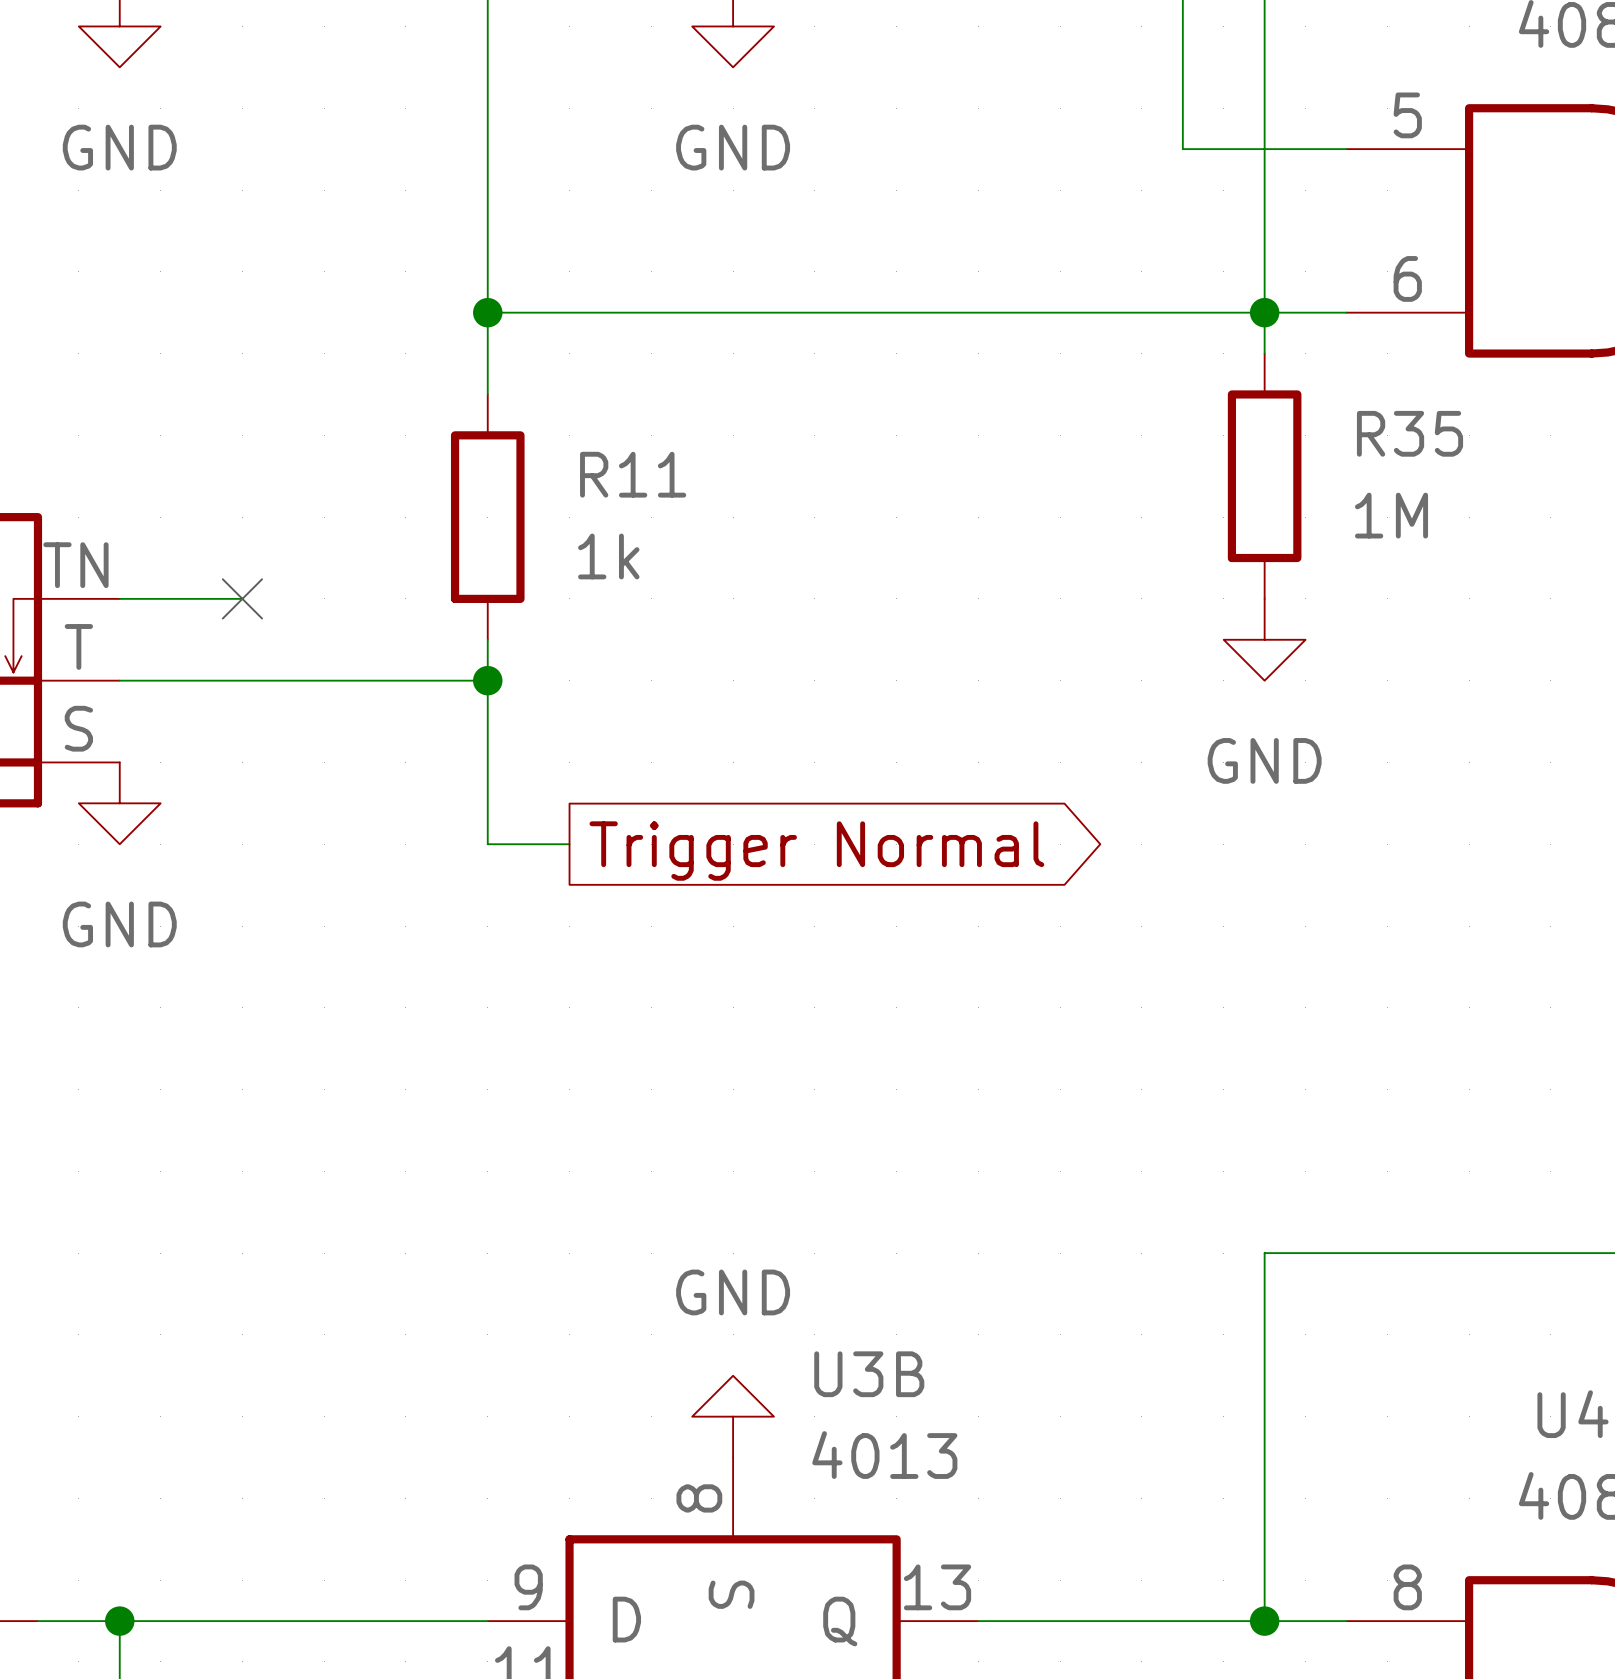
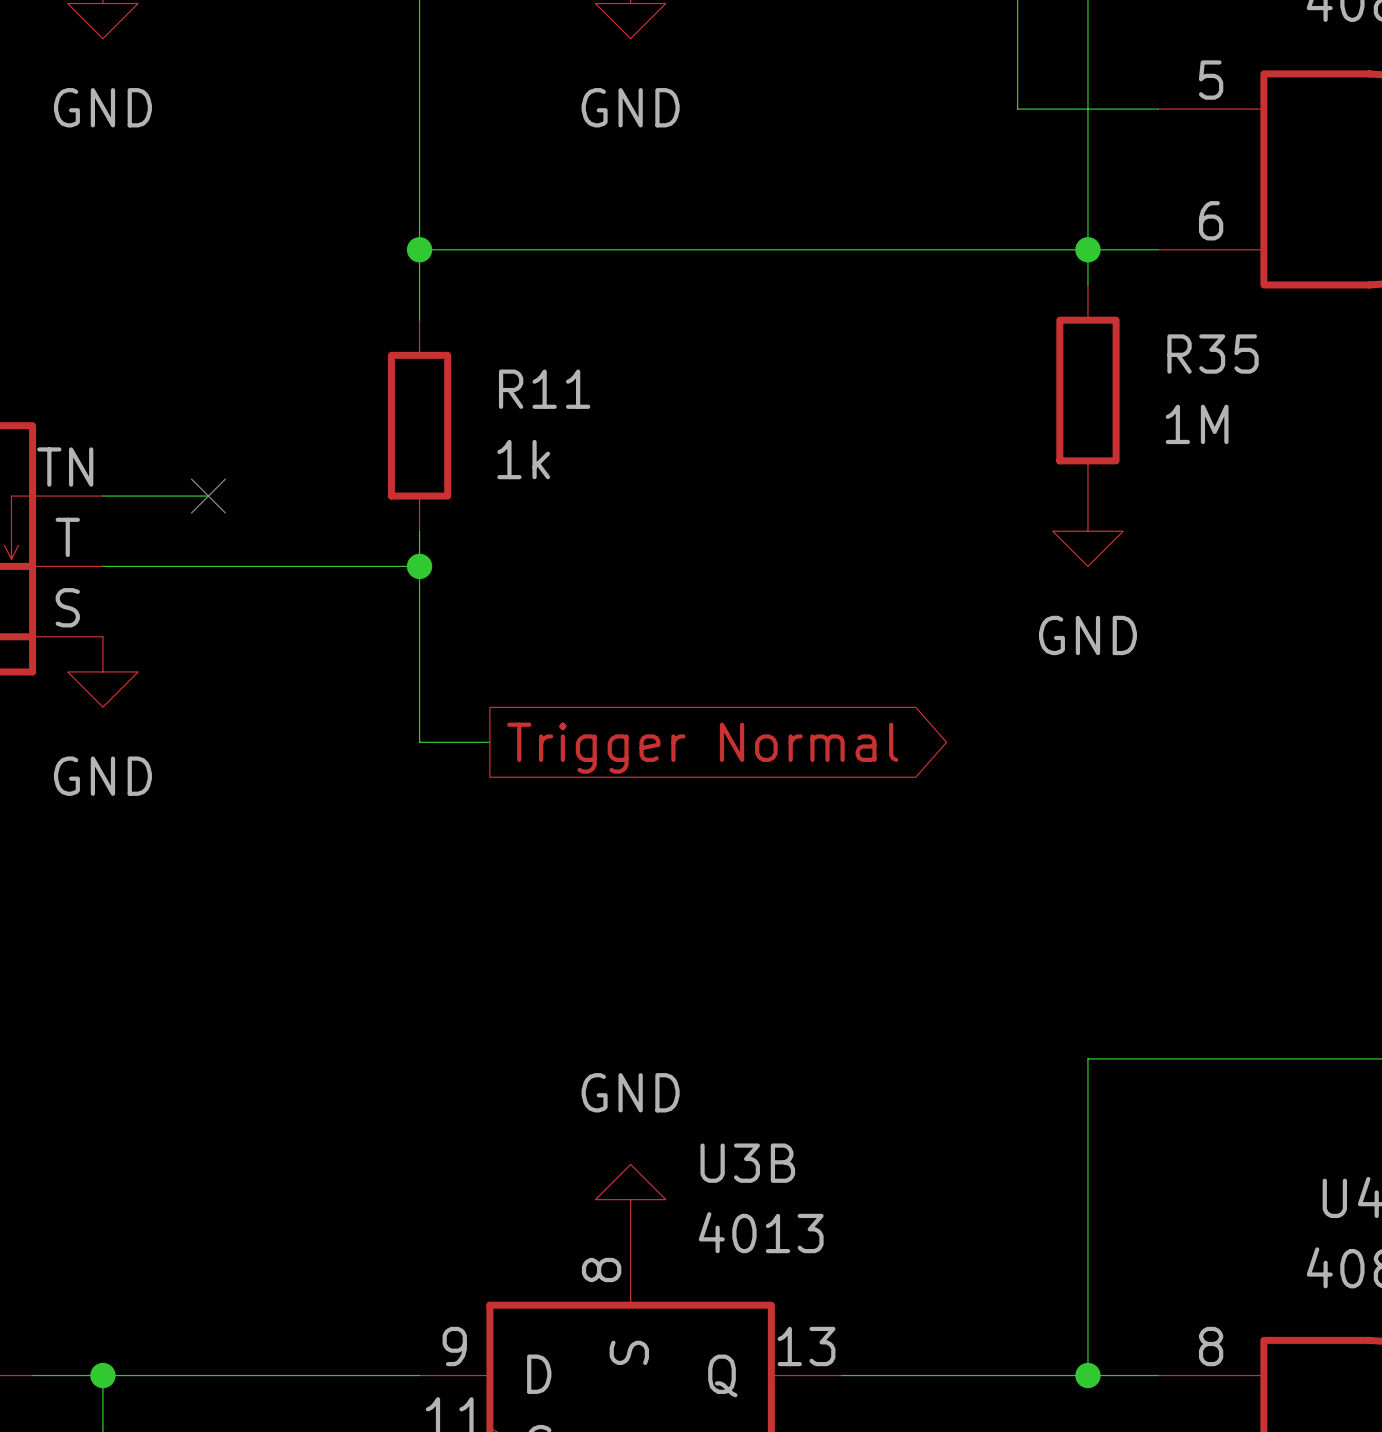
wire: (487, 844) (569, 844) -> (419, 707) (419, 742) (489, 742)
global label position: Trigger Normal (816, 851) -> Trigger Normal (702, 748)

